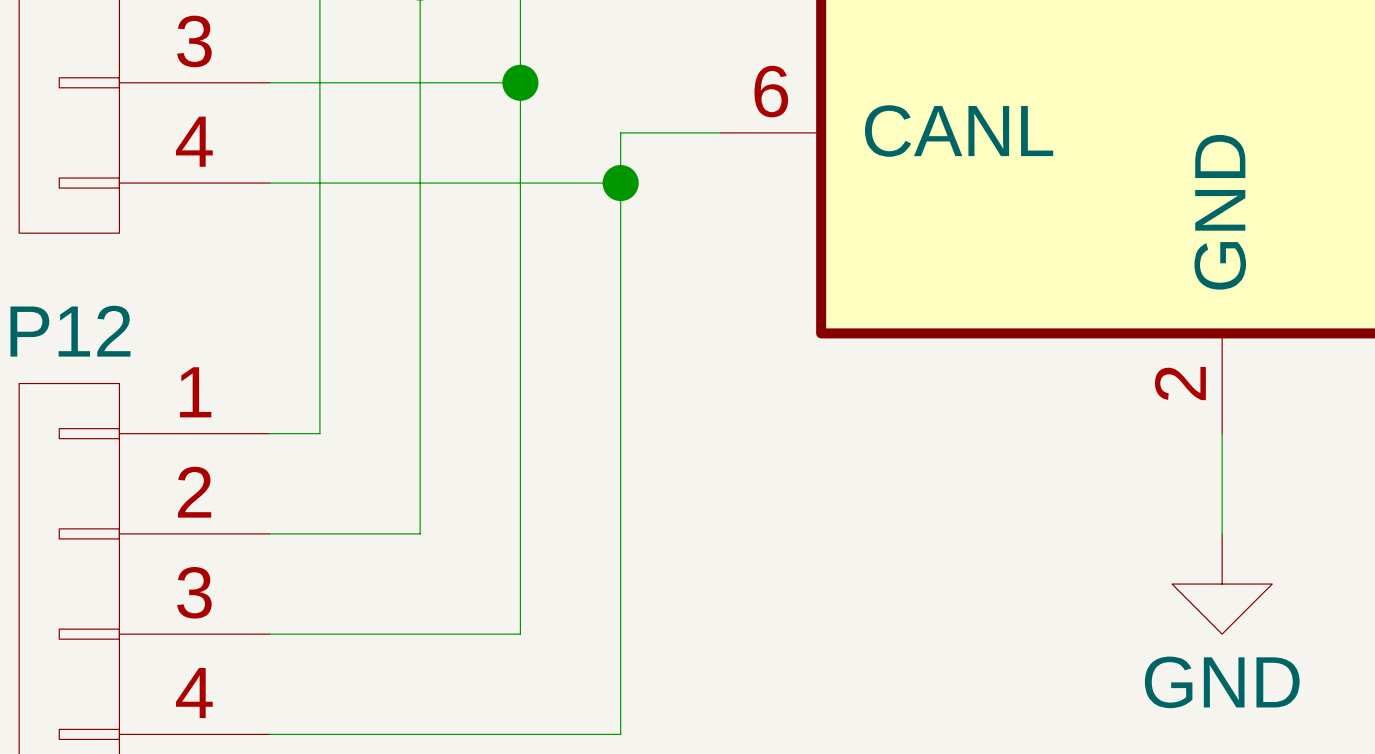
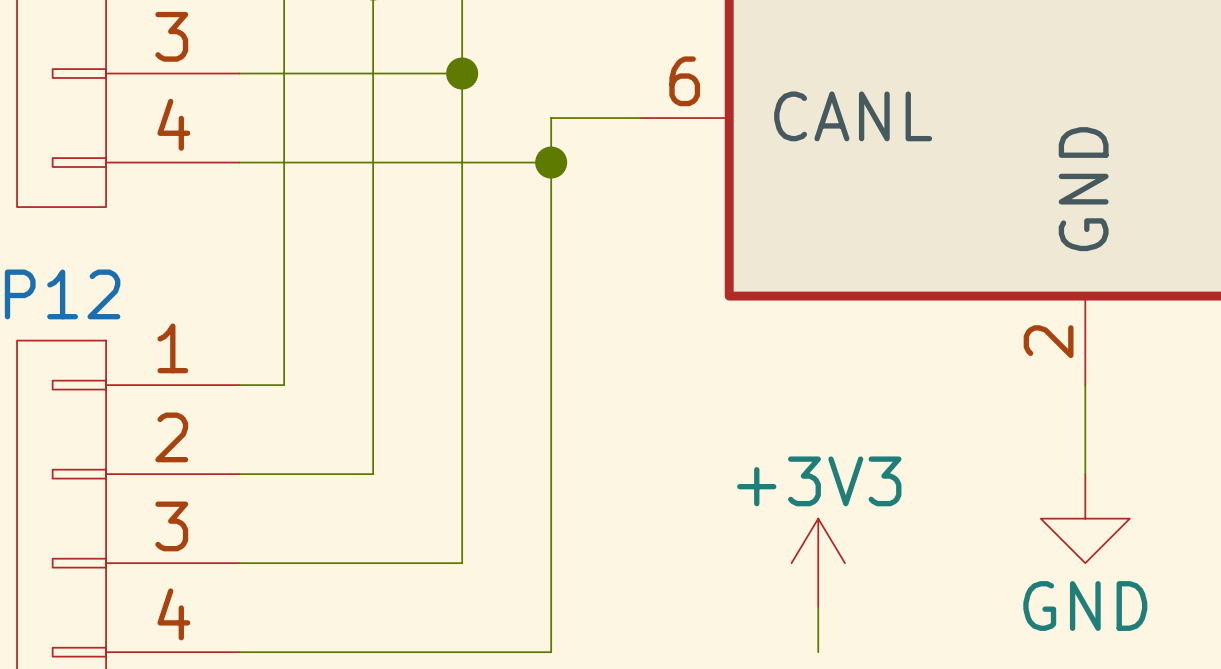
power symbol: none -> +3V3 (818, 563)
wire: none -> (818, 607) (818, 652)

